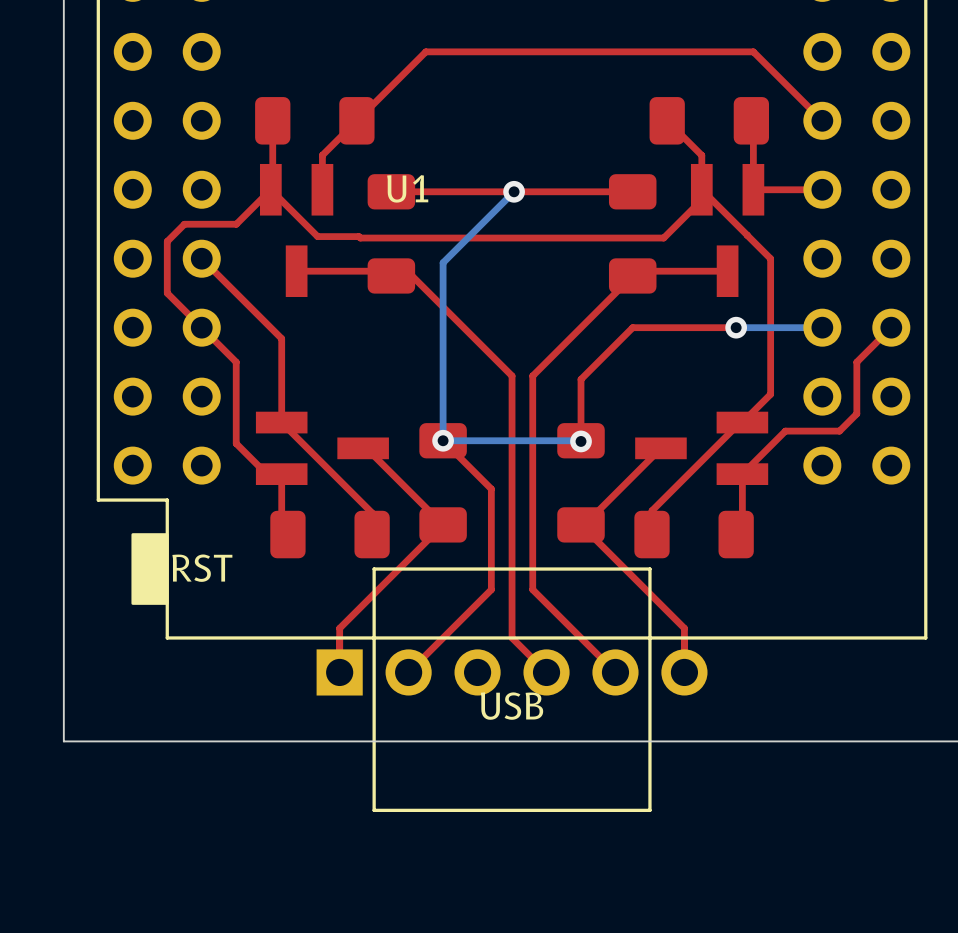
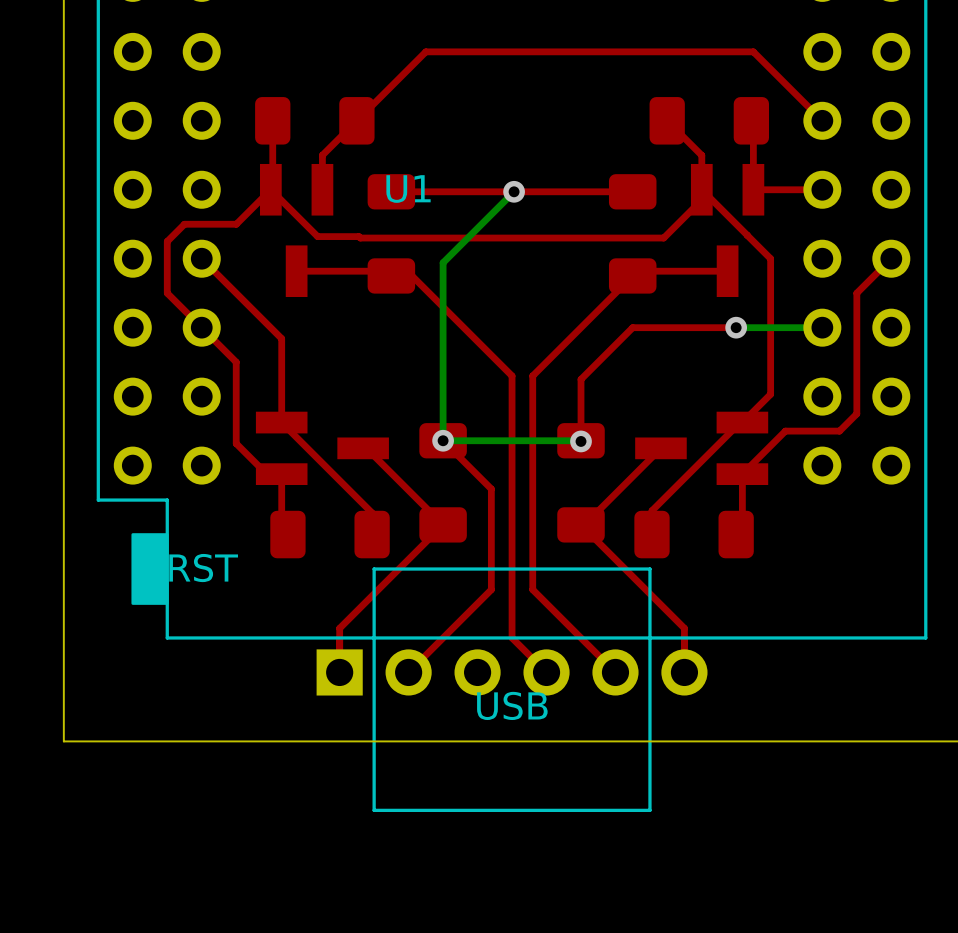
top track: (891, 327) (856, 362) -> (891, 258) (856, 293) (856, 362)

